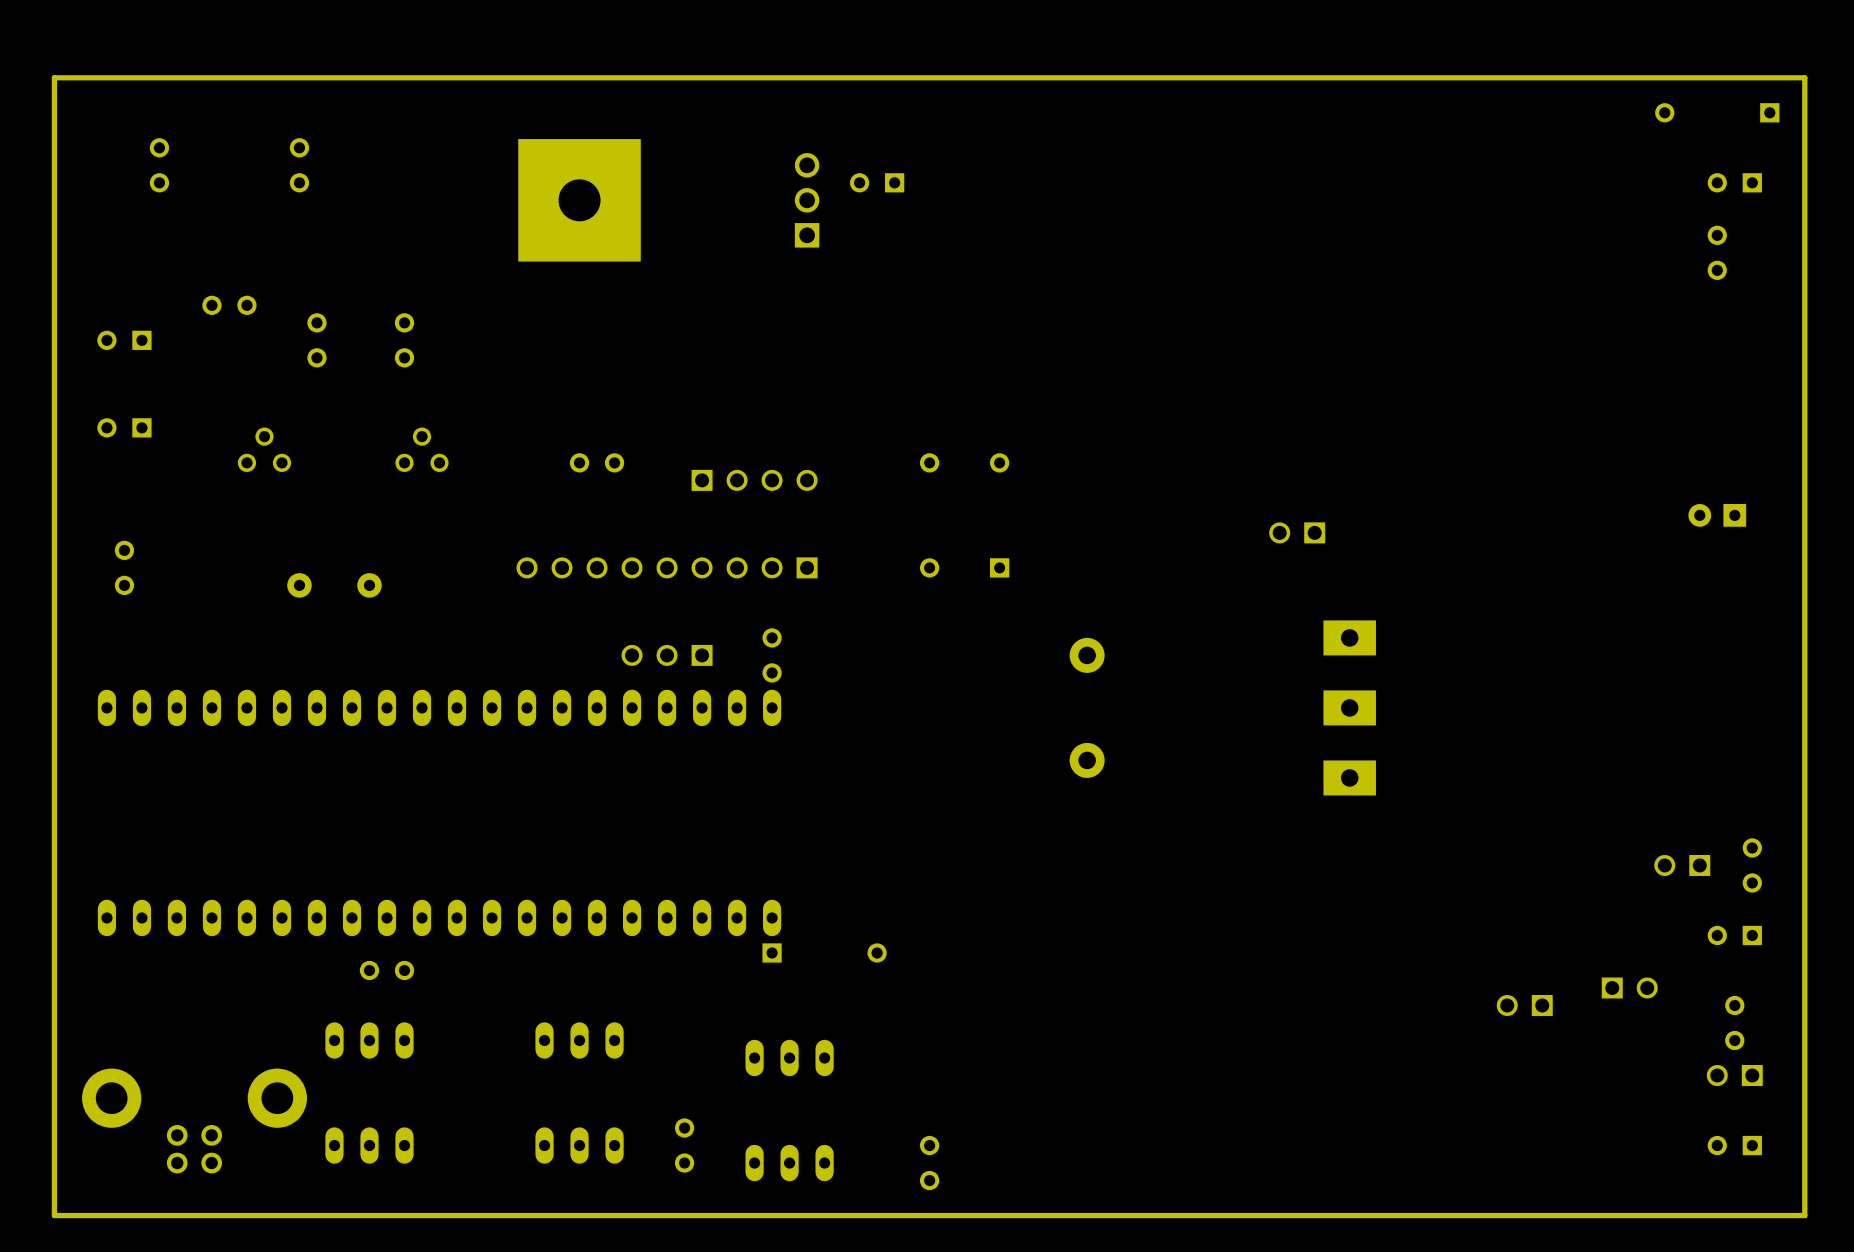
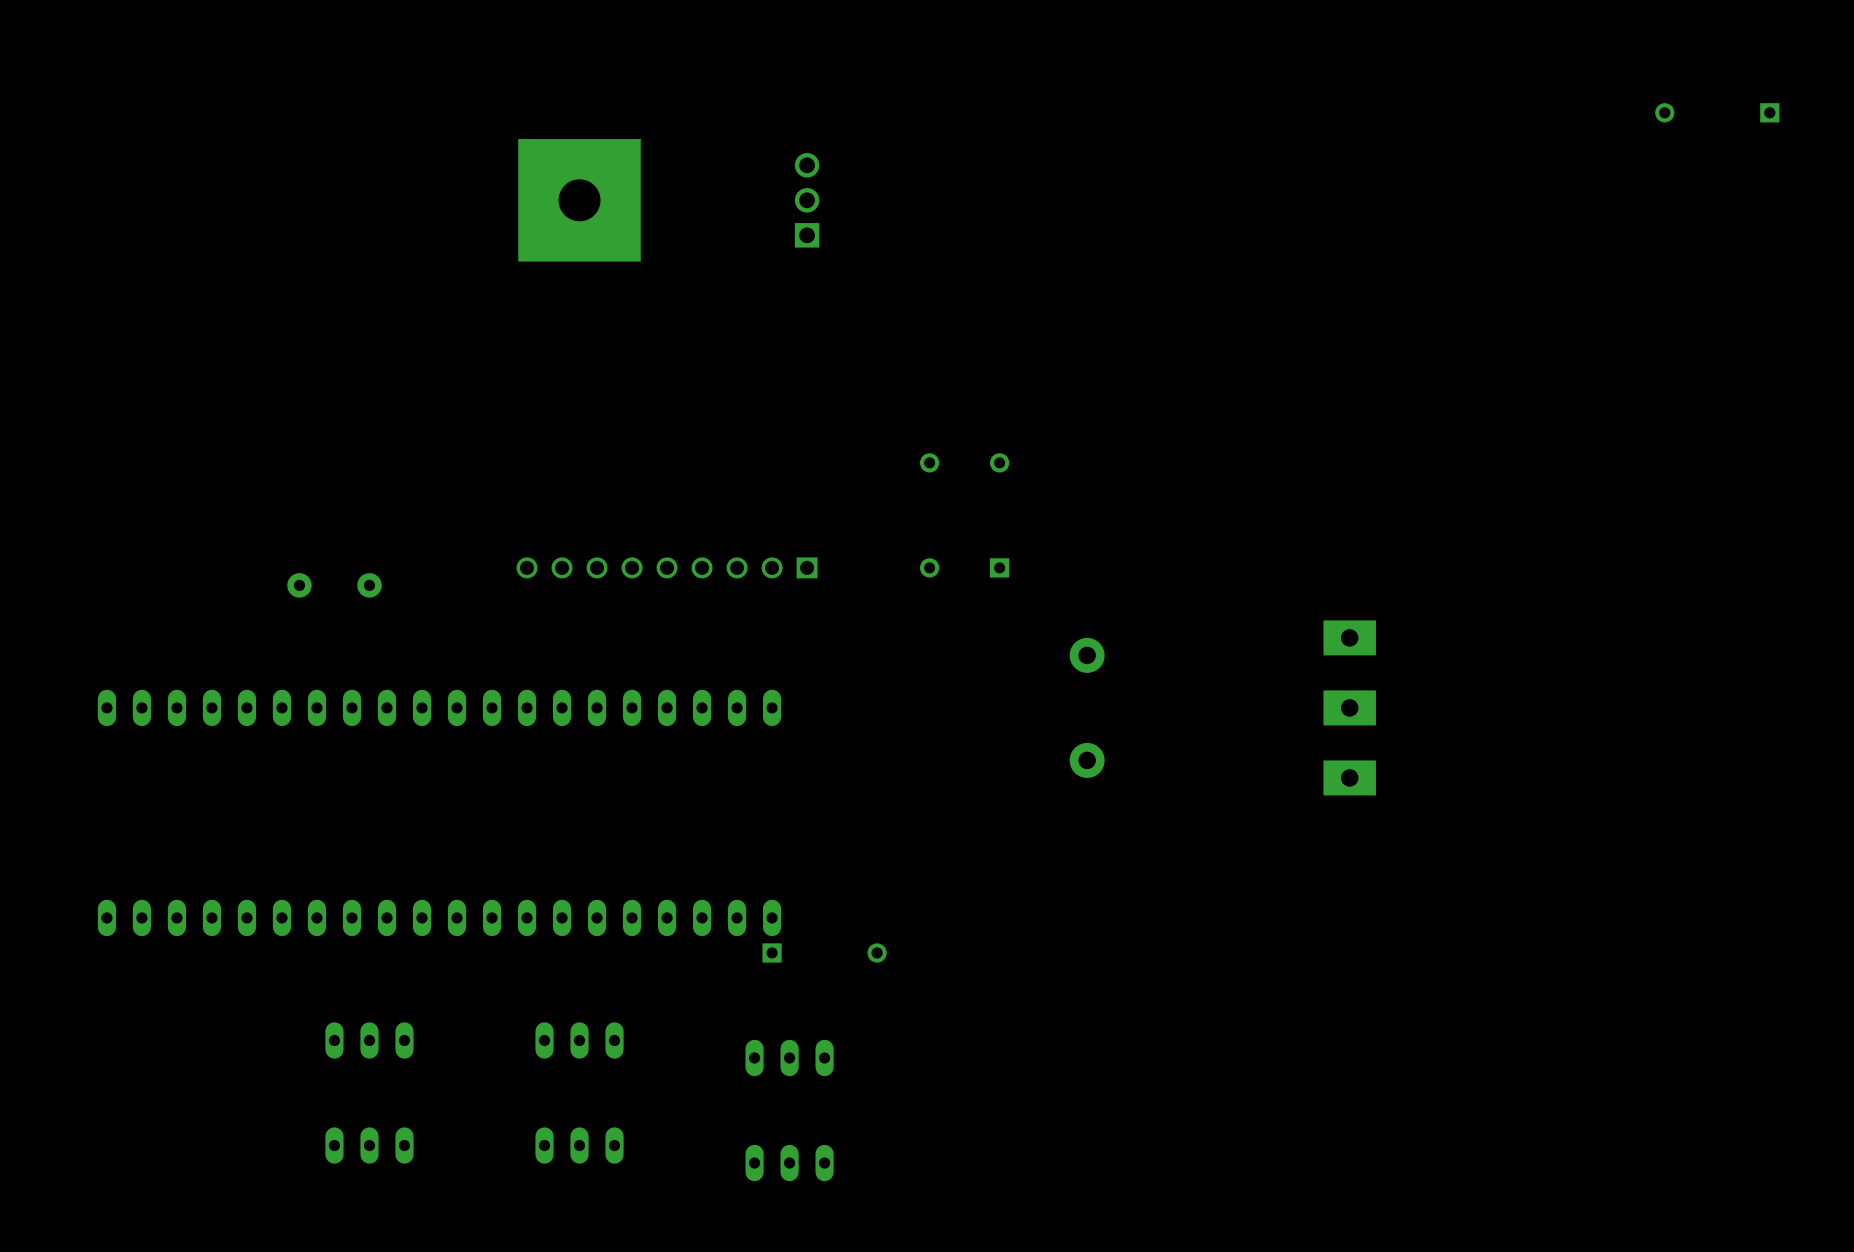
board edge: (1804, 77) (54, 77) (54, 1215) (1804, 1215) (1804, 77) -> none
part: (159, 165) -> none
part: (299, 165) -> none
part: (877, 182) -> none
part: (1734, 182) -> none
part: (1717, 252) -> none
part: (229, 305) -> none
part: (124, 340) -> none
part: (316, 340) -> none
part: (404, 340) -> none
part: (124, 427) -> none
part: (264, 449) -> none
part: (421, 449) -> none
part: (597, 462) -> none
part: (754, 480) -> none
part: (1717, 515) -> none
part: (1297, 532) -> none
part: (124, 567) -> none
part: (667, 655) -> none
part: (772, 655) -> none
part: (1682, 865) -> none
part: (1752, 865) -> none
part: (1734, 935) -> none
part: (386, 970) -> none
part: (1629, 987) -> none
part: (1524, 1005) -> none
part: (1734, 1022) -> none
part: (1734, 1075) -> none
part: (194, 1120) -> none
part: (684, 1145) -> none
part: (1734, 1145) -> none
part: (929, 1163) -> none

